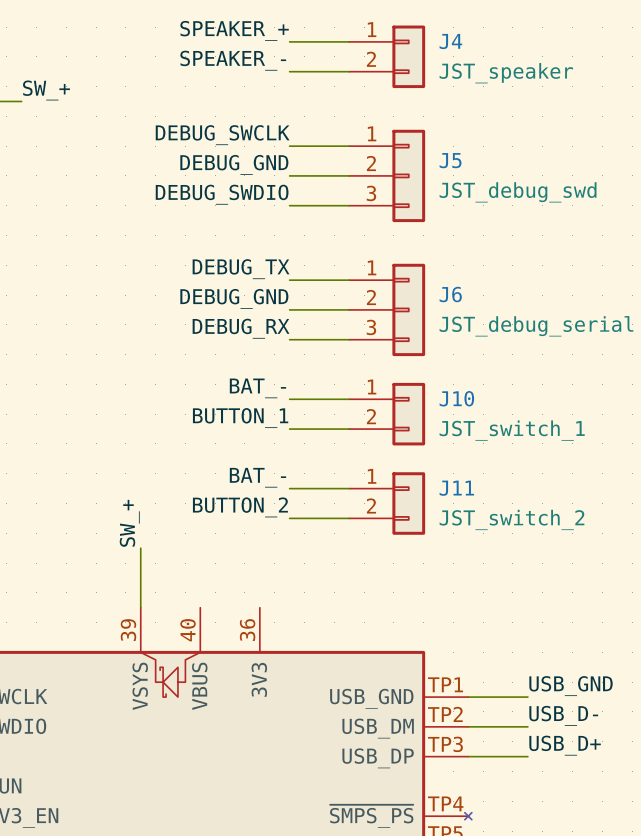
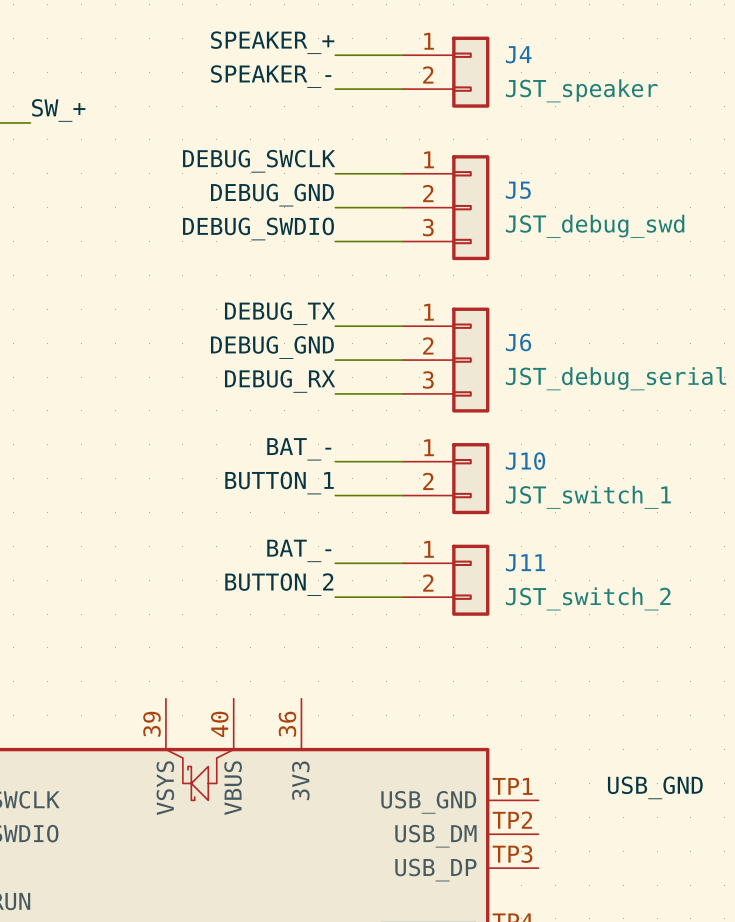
label: SW_+ (129, 523) -> none
wire: (140, 548) (140, 607) -> none
wire: (468, 697) (527, 697) -> none
label: USB_D- (563, 715) -> none
wire: (468, 726) (527, 726) -> none
label: USB_D+ (565, 745) -> none
wire: (468, 756) (527, 756) -> none

